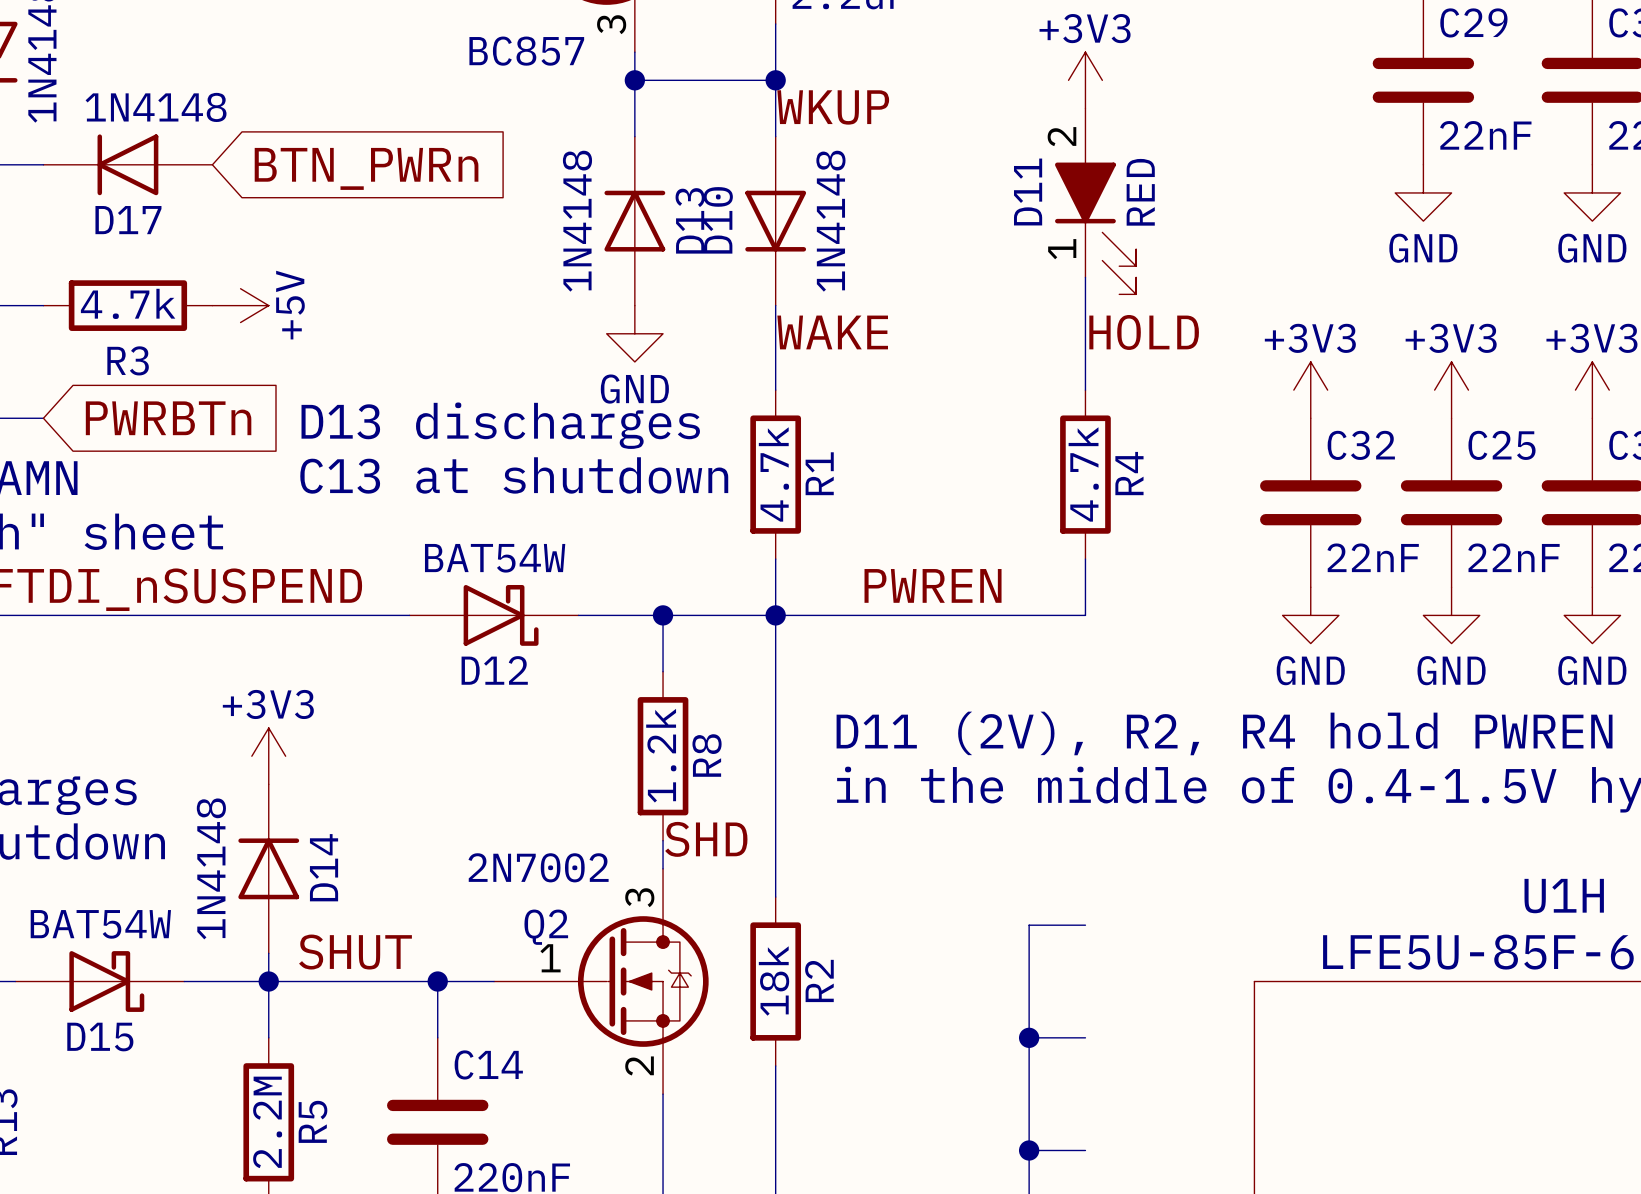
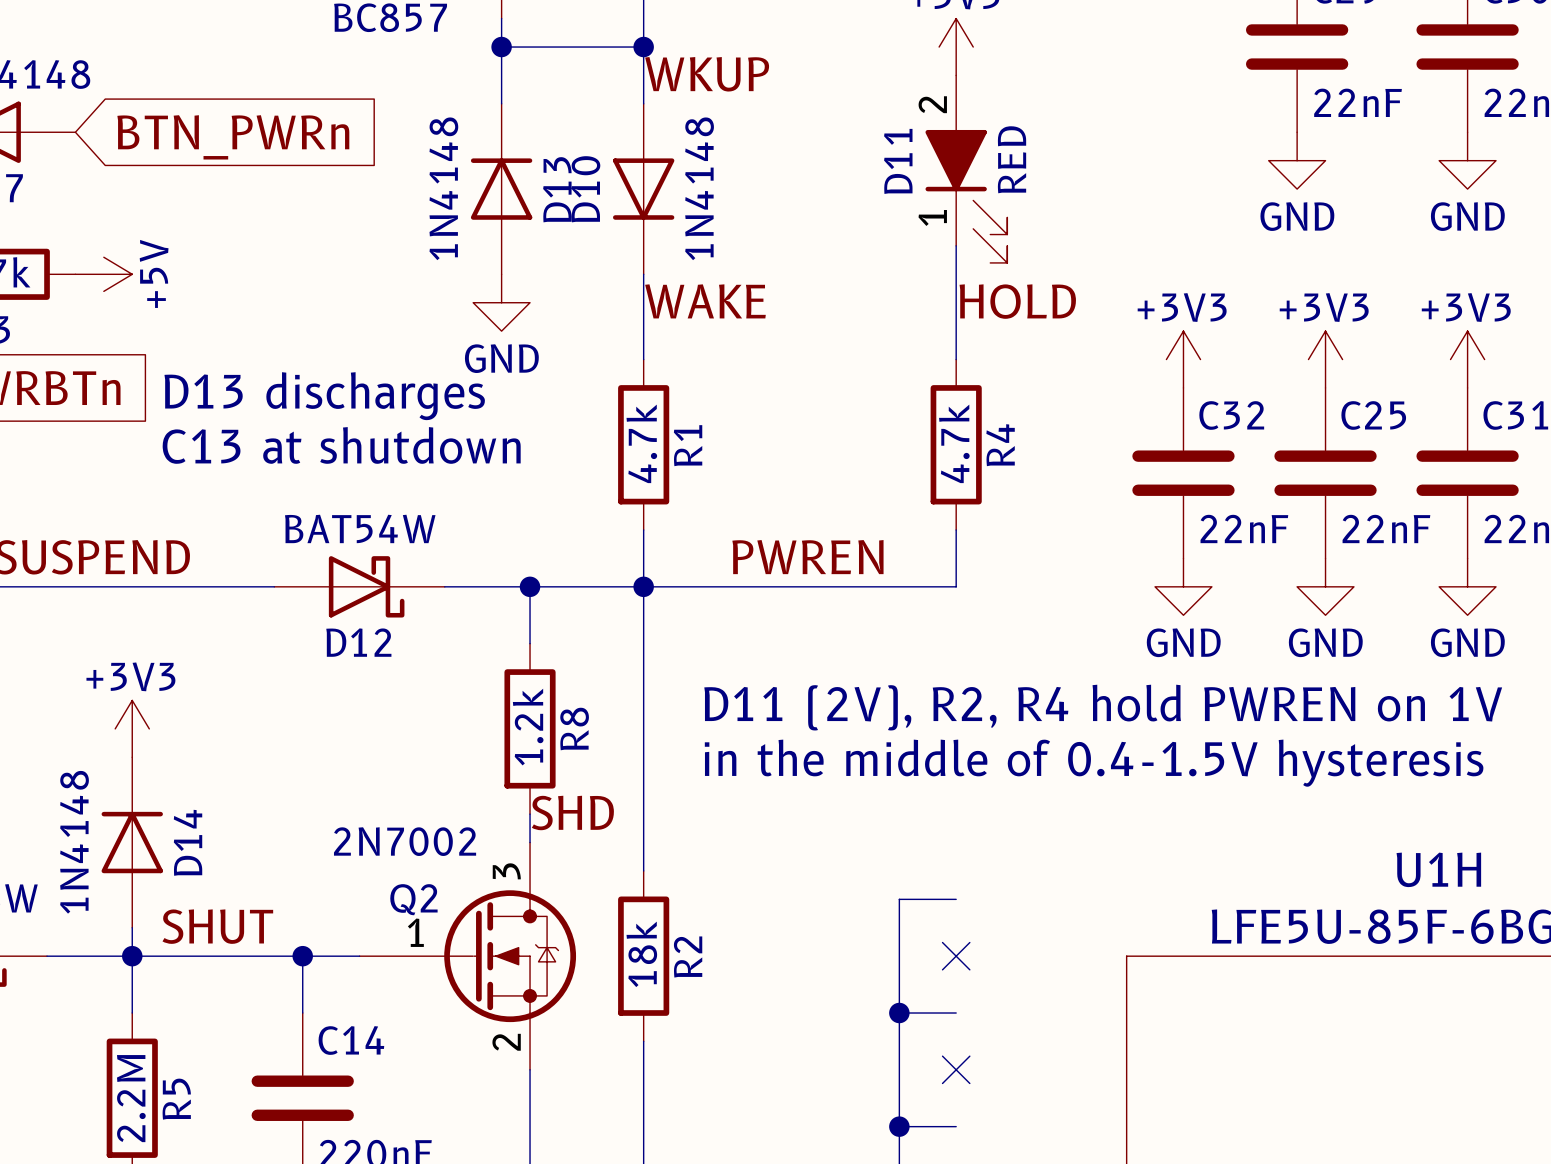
no-connect mark: none -> (956, 956)
no-connect mark: none -> (956, 1069)

